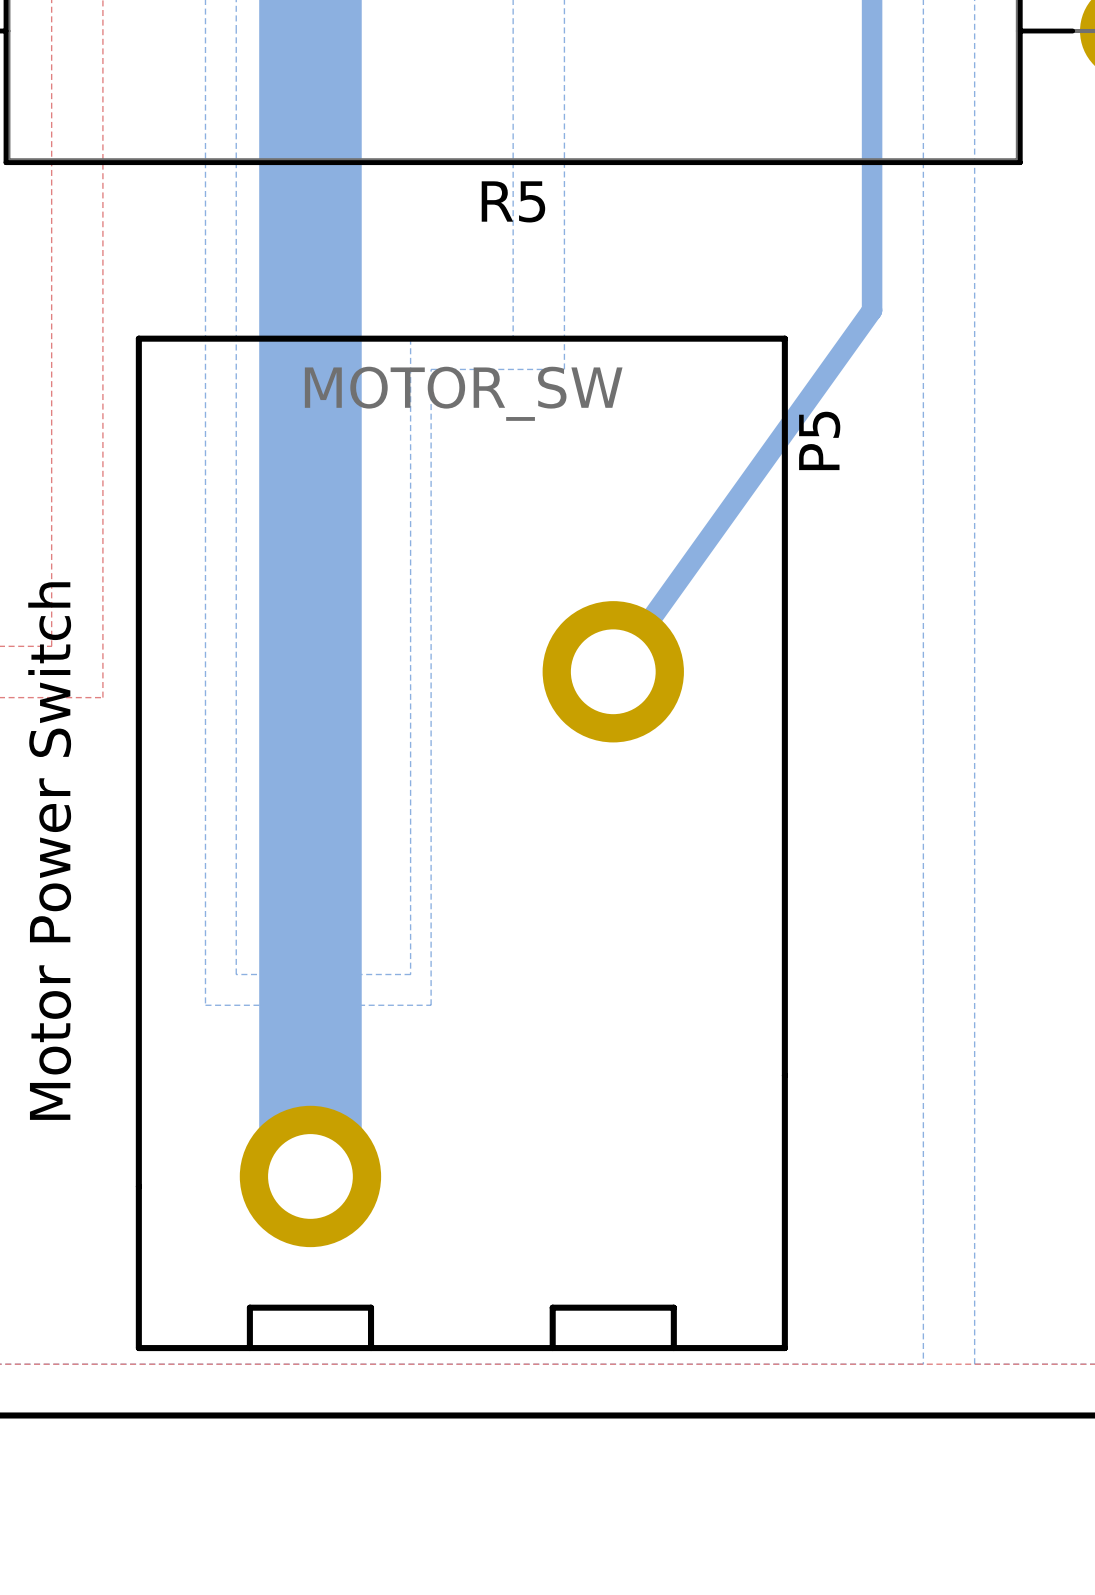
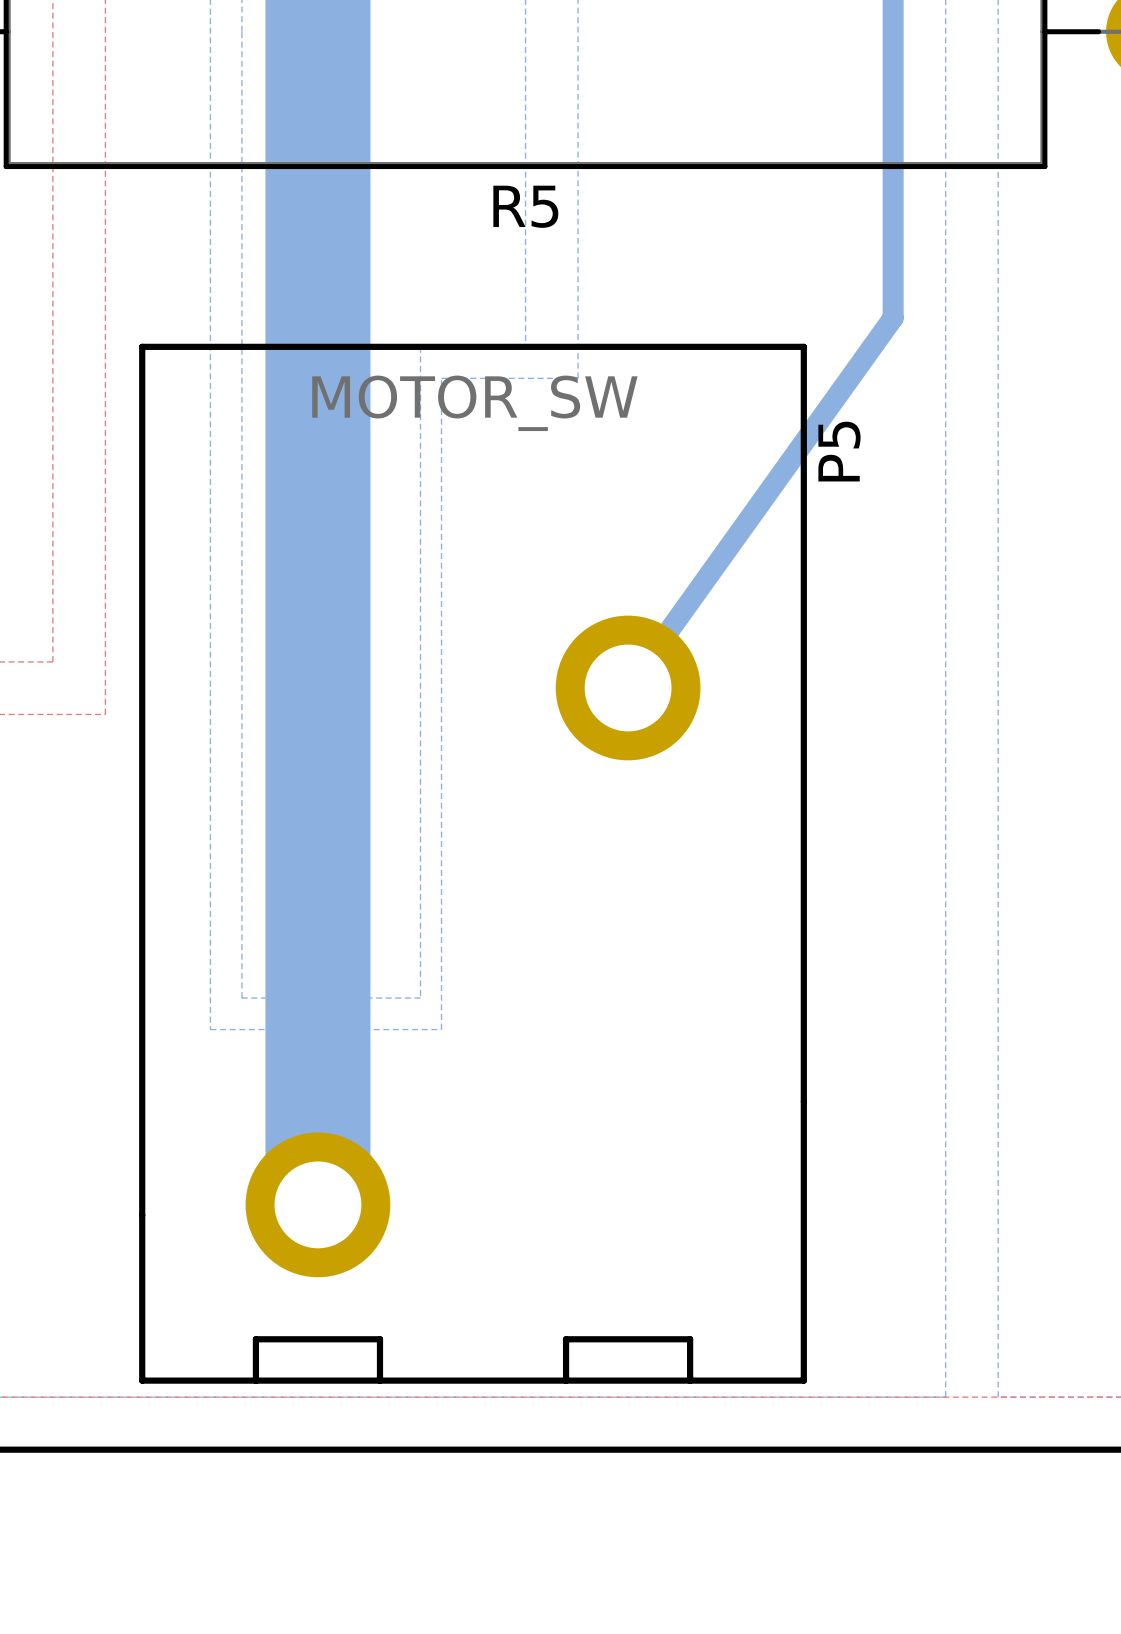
text: Motor Power Switch (49, 851) -> none

